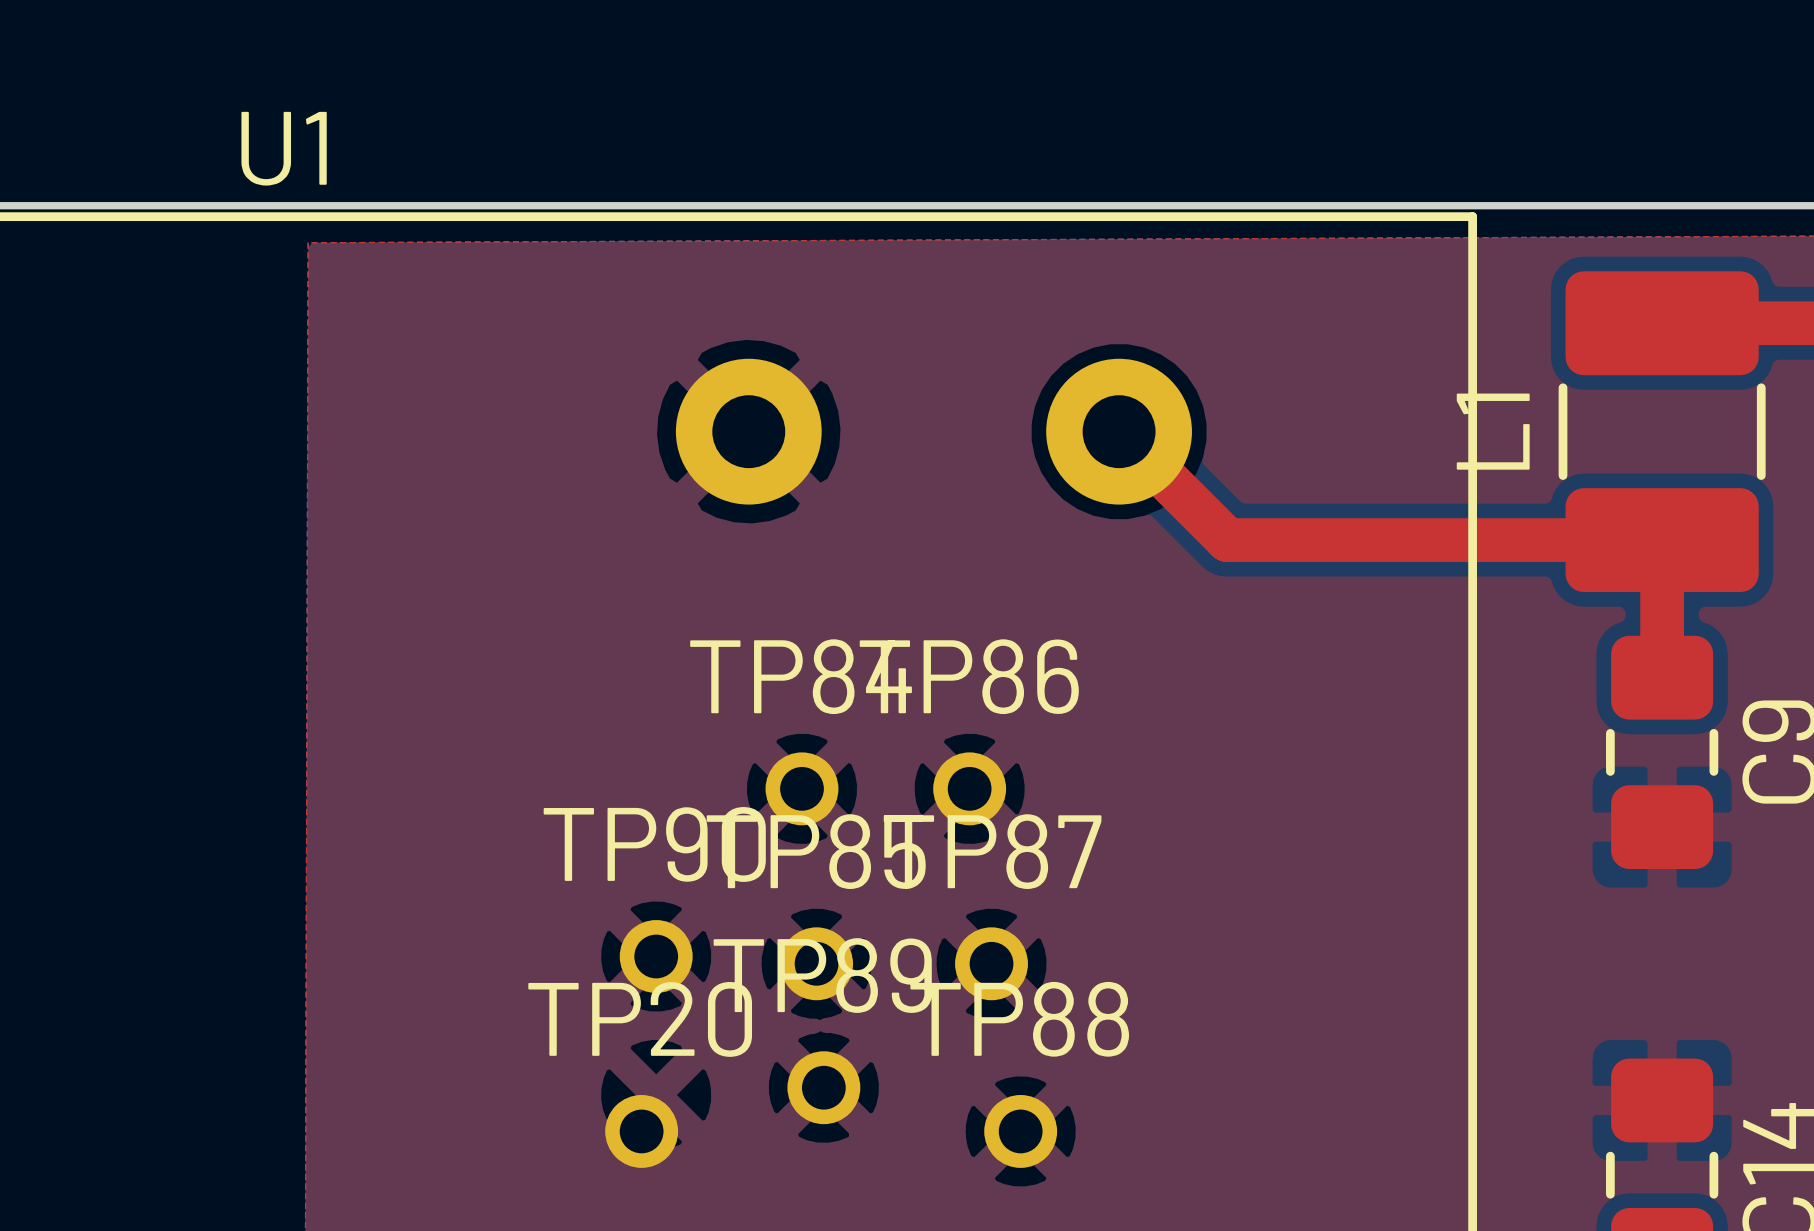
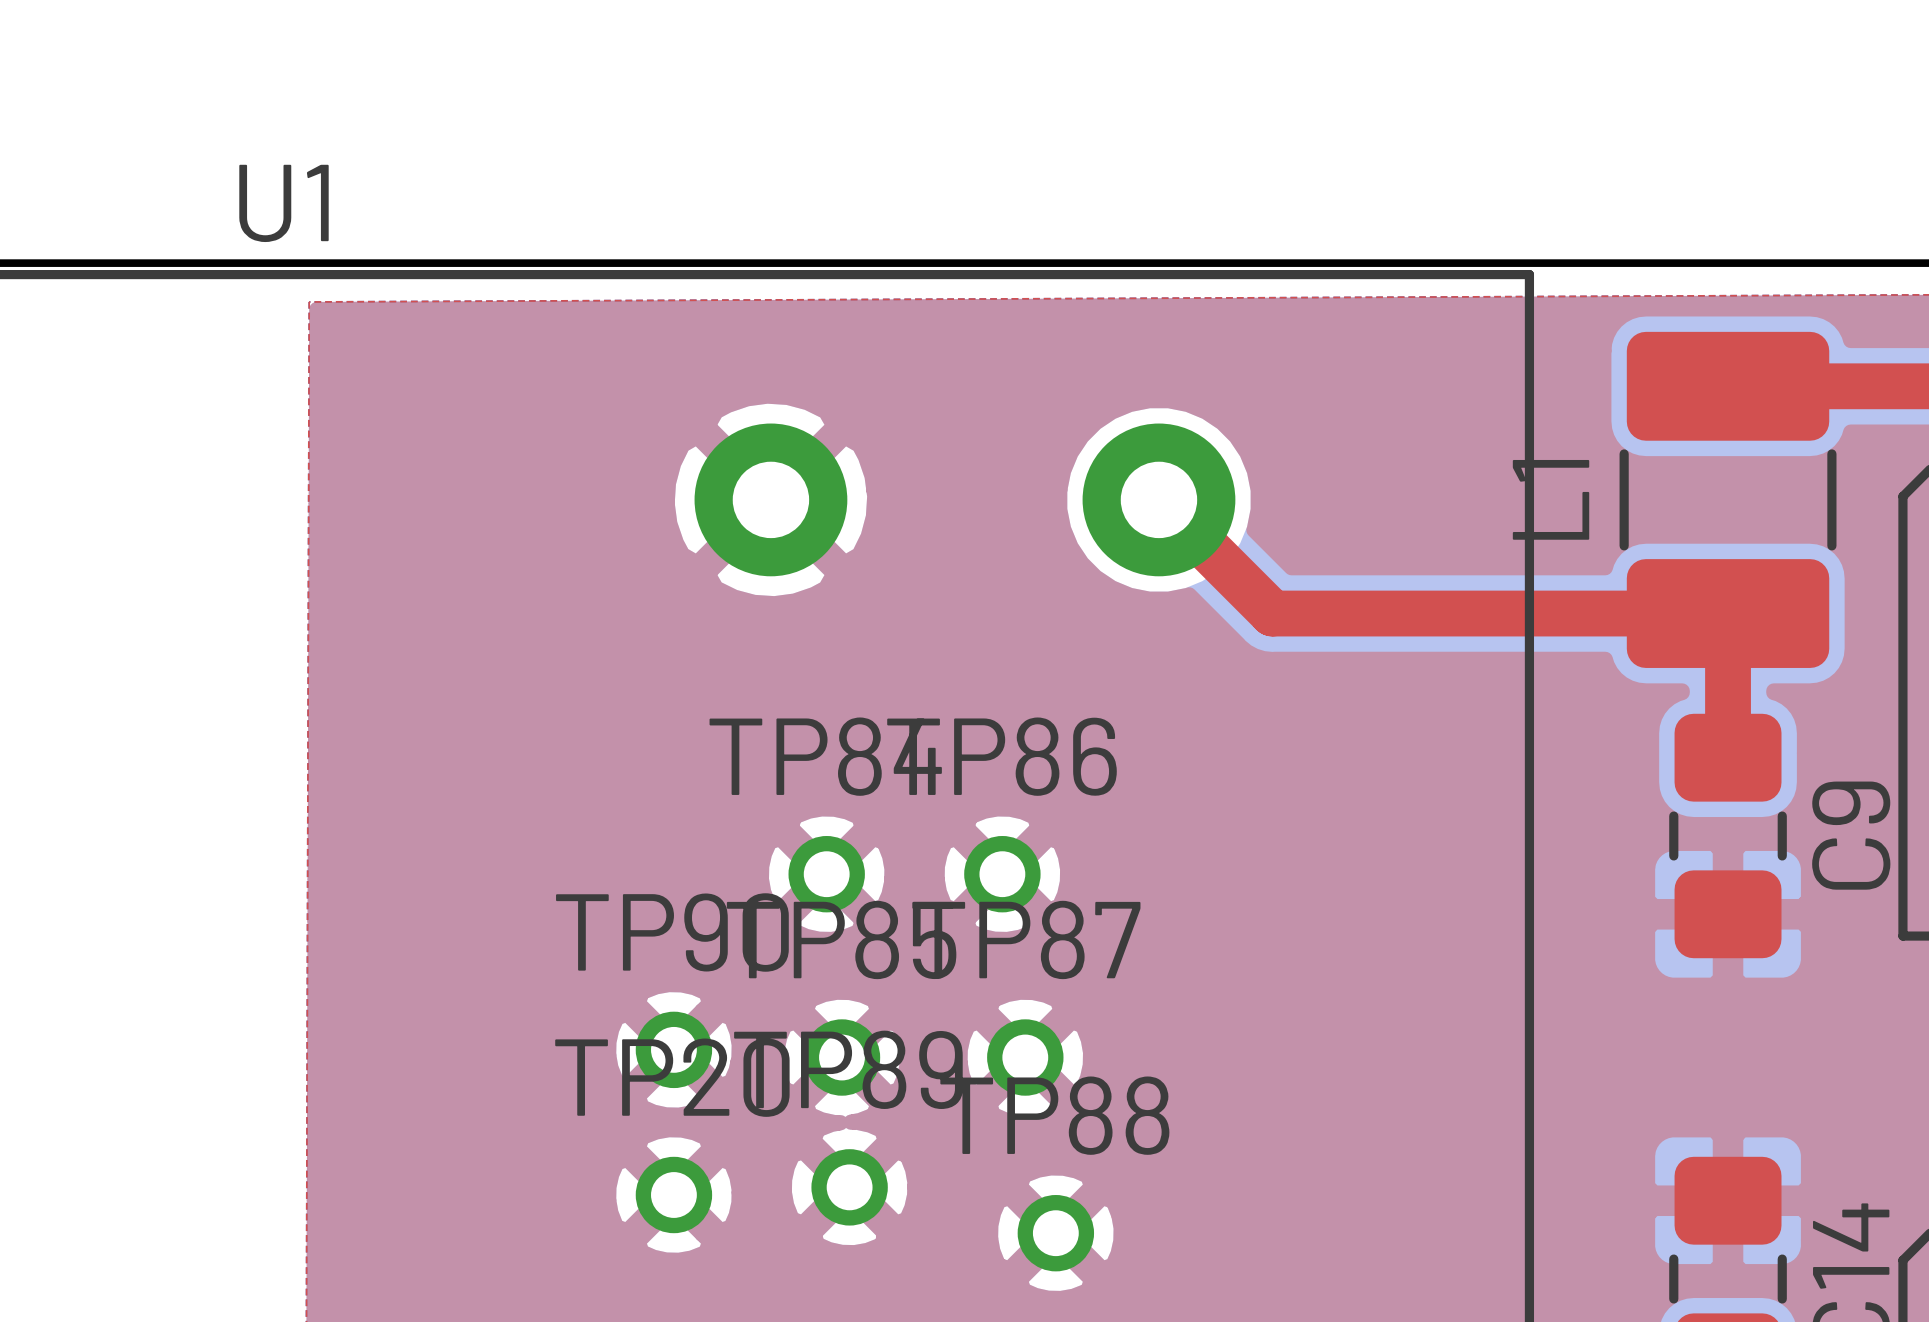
TP20 position: (641, 1131) -> (673, 1195)

